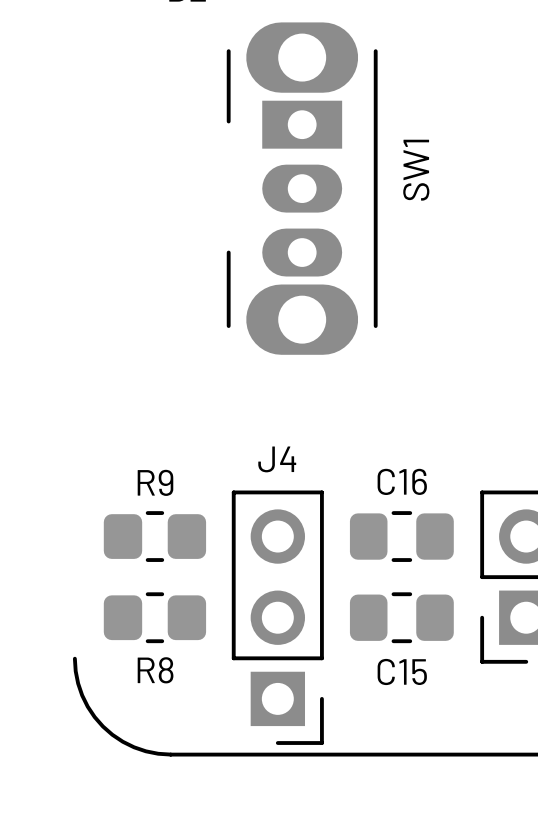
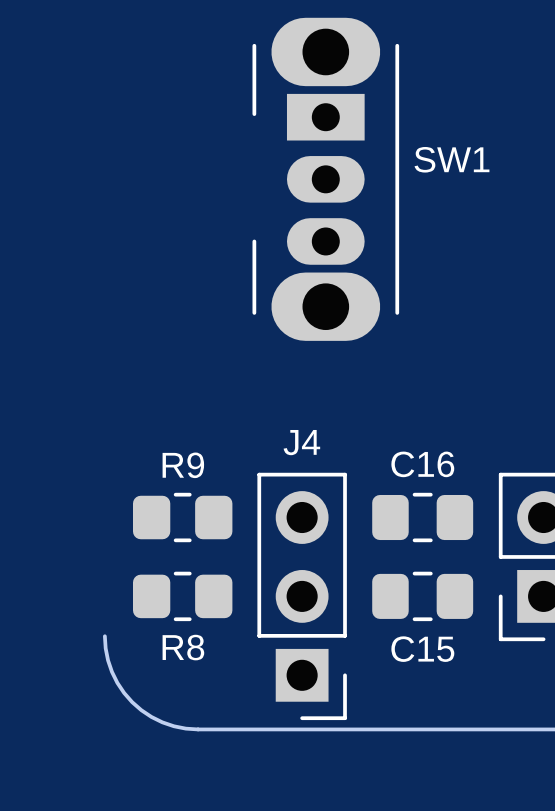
SW1 name rotation: 0° (416, 170) -> 90° clockwise (451, 159)

